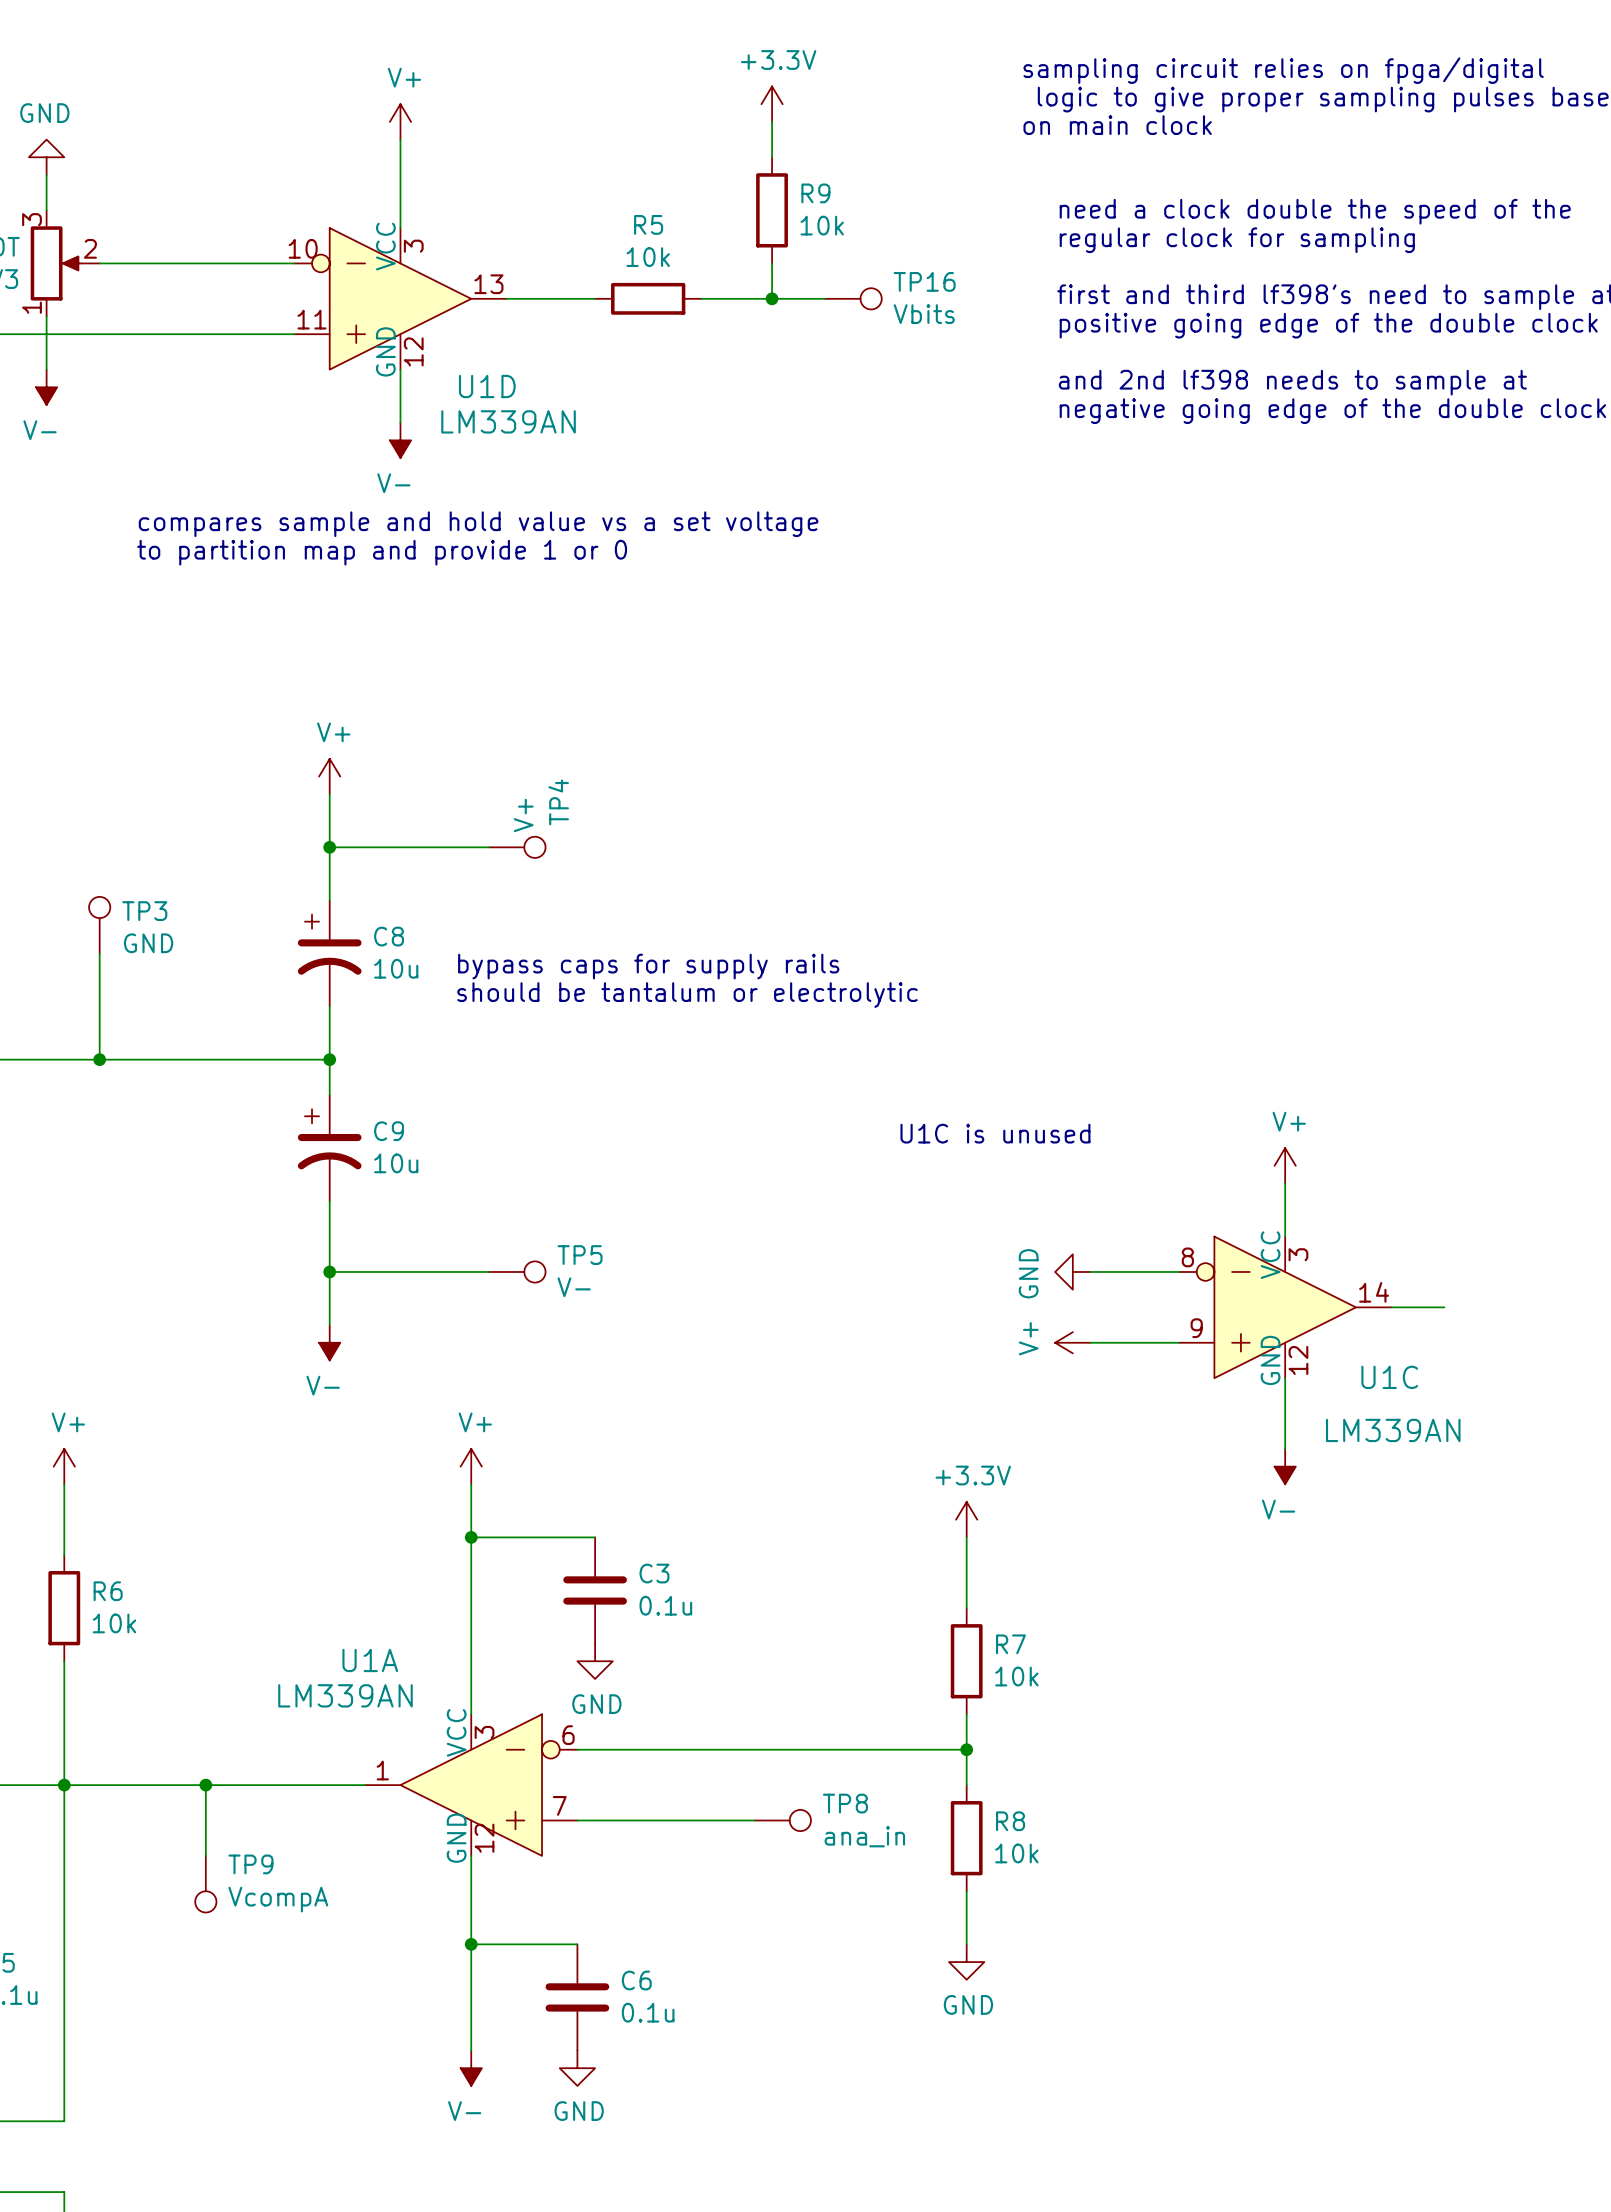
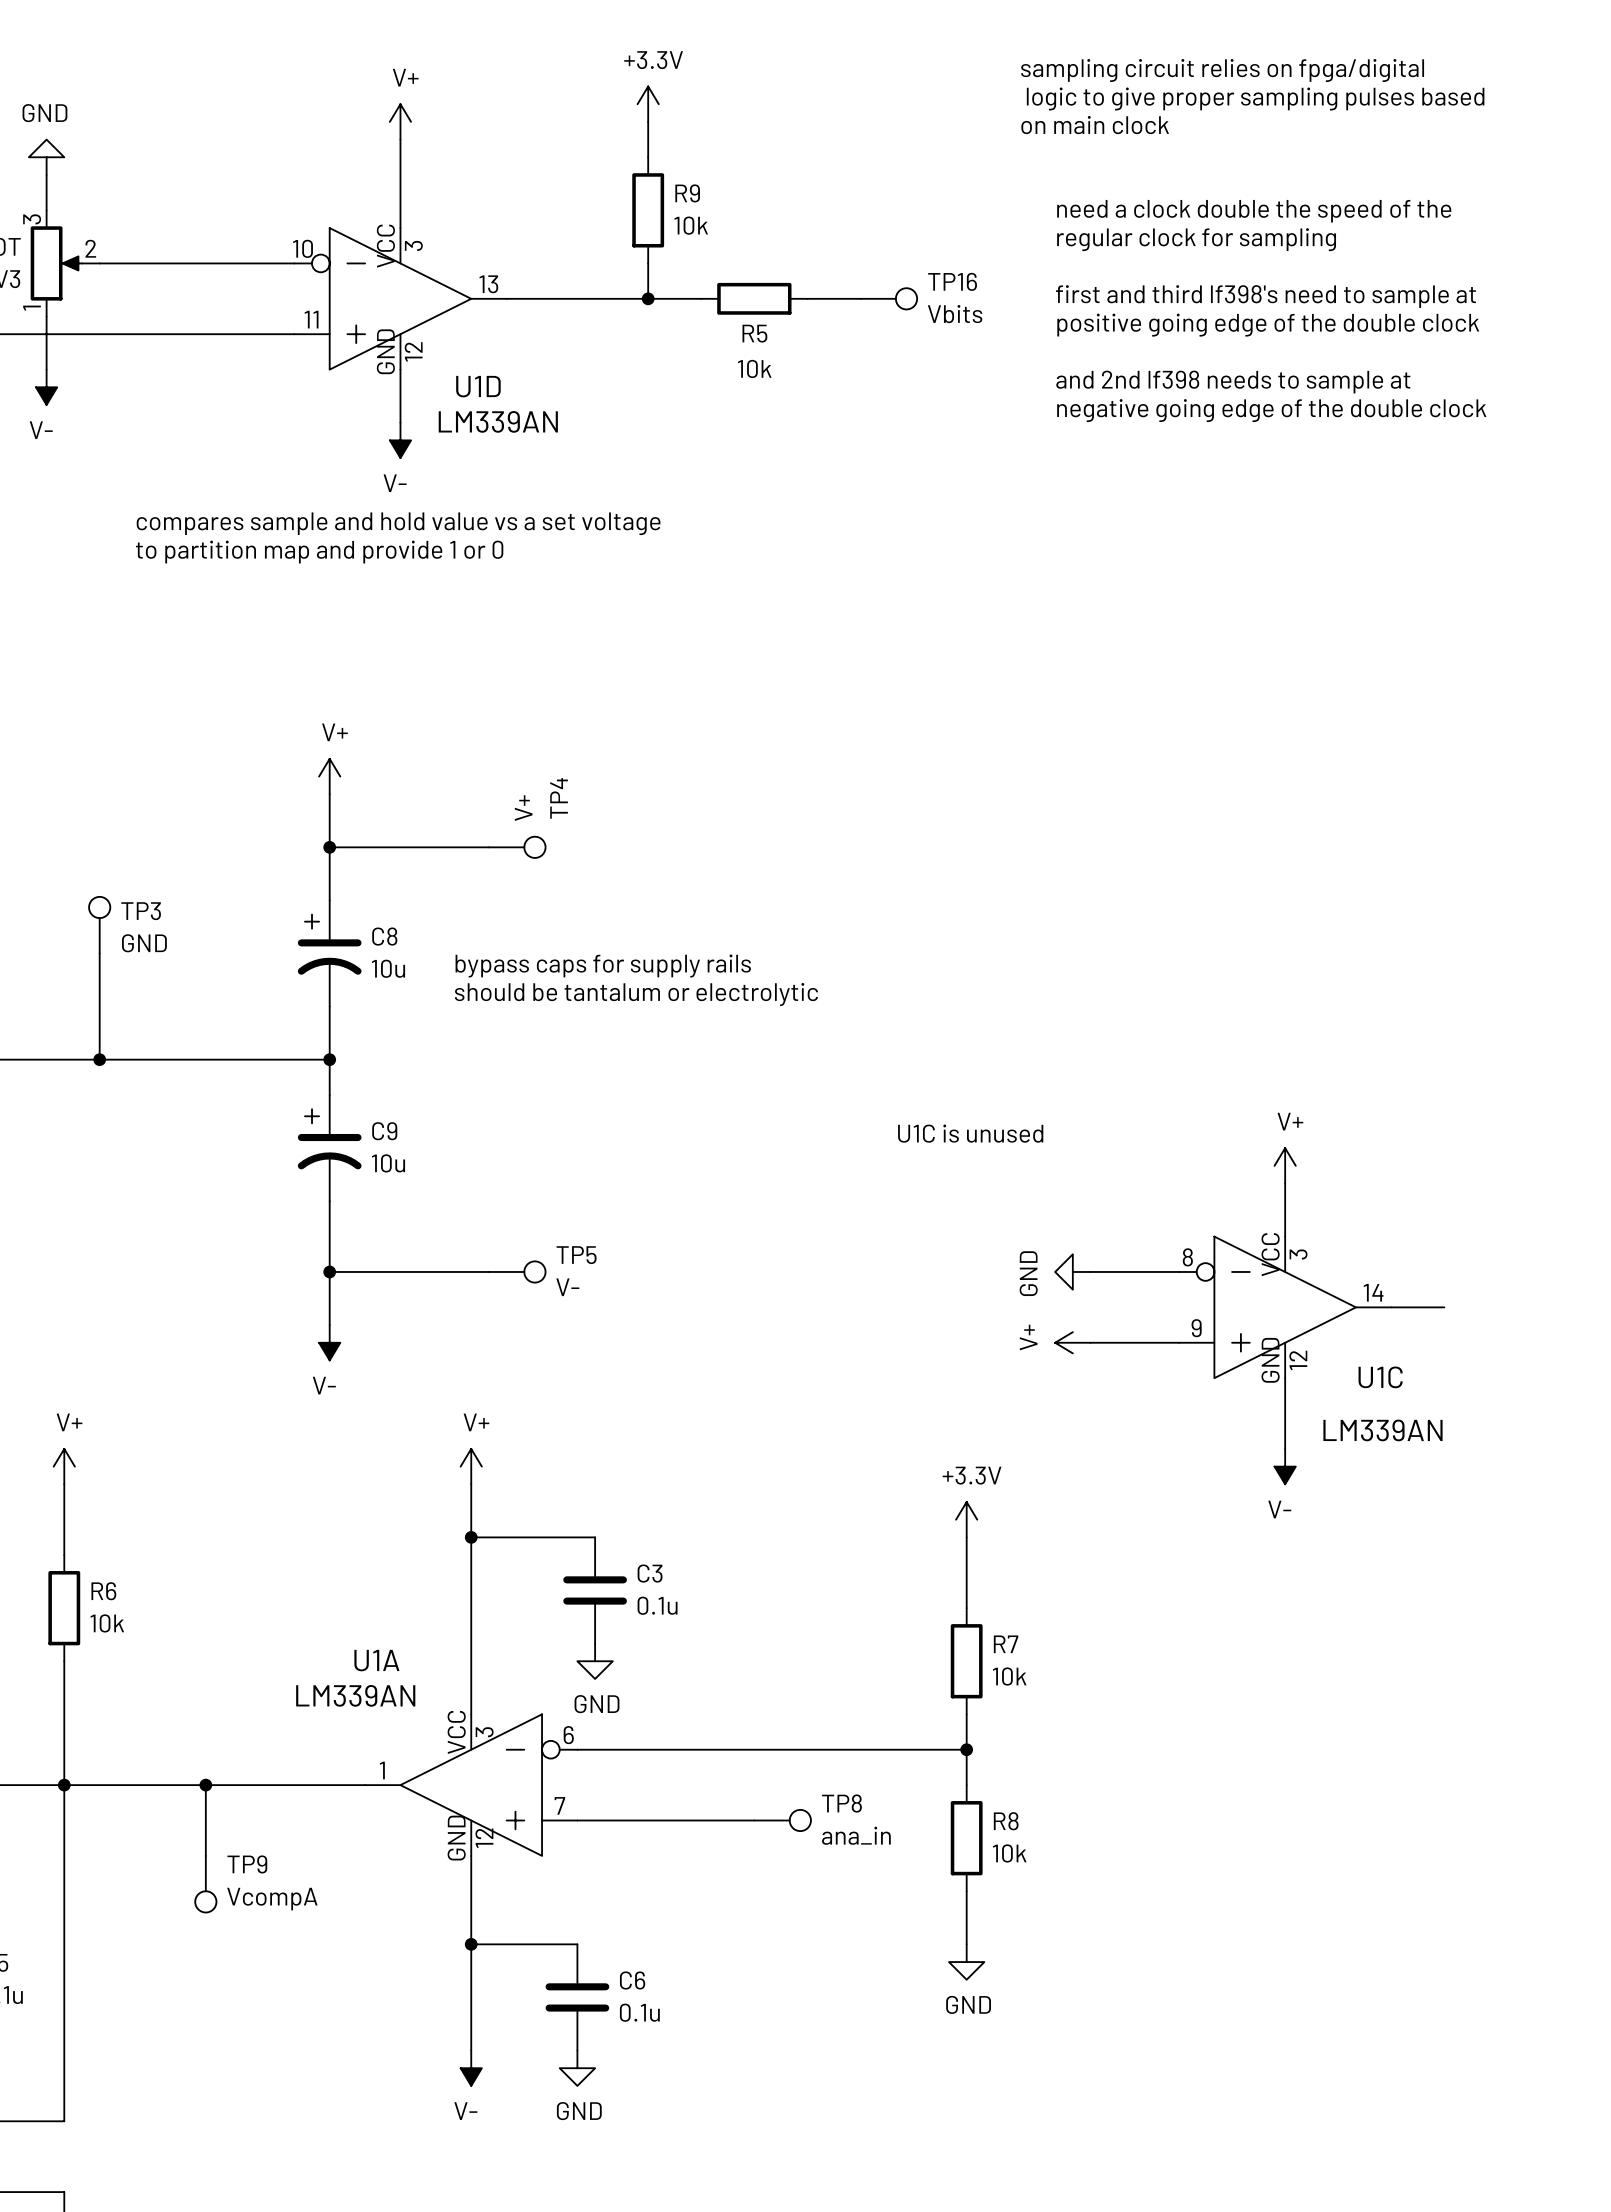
power symbol position: +3.3V (772, 104) -> +3.3V (648, 104)
wire: (772, 121) (772, 157) -> (648, 121) (648, 157)
R9 position: (772, 210) -> (648, 210)
R5 name position: R5 (648, 224) -> R5 (754, 333)
R5 value position: 10k (648, 257) -> 10k (754, 368)
wire: (772, 263) (772, 298) -> (648, 263) (648, 298)
R5 position: (648, 298) -> (754, 298)
junction: none -> (648, 298)
wire: (701, 298) (807, 298) -> (701, 298) (595, 298)
junction: (772, 298) -> none
TP16 position: (853, 298) -> (888, 298)

